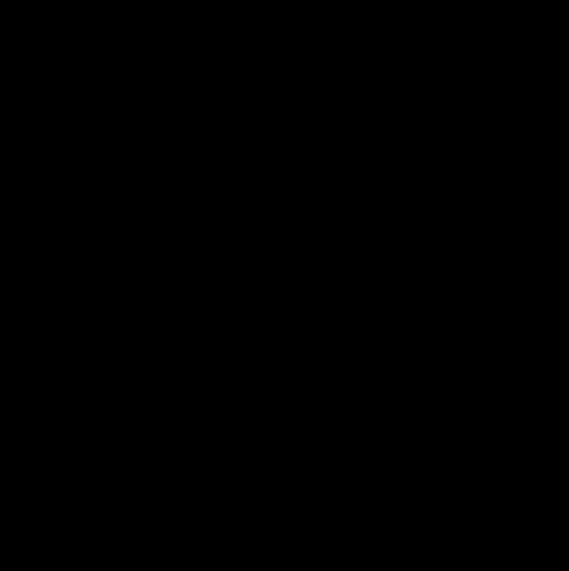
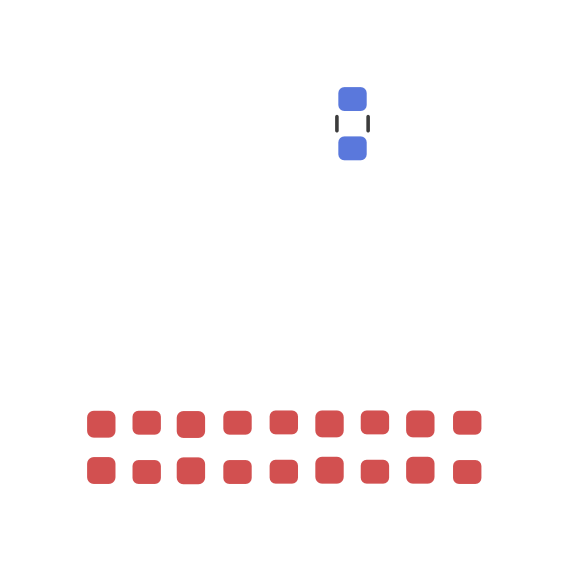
part: none -> (352, 123)
part: none -> (101, 447)
part: none -> (146, 447)
part: none -> (190, 447)
part: none -> (237, 447)
part: none -> (283, 447)
part: none -> (329, 447)
part: none -> (374, 447)
part: none -> (420, 447)
part: none -> (467, 447)

